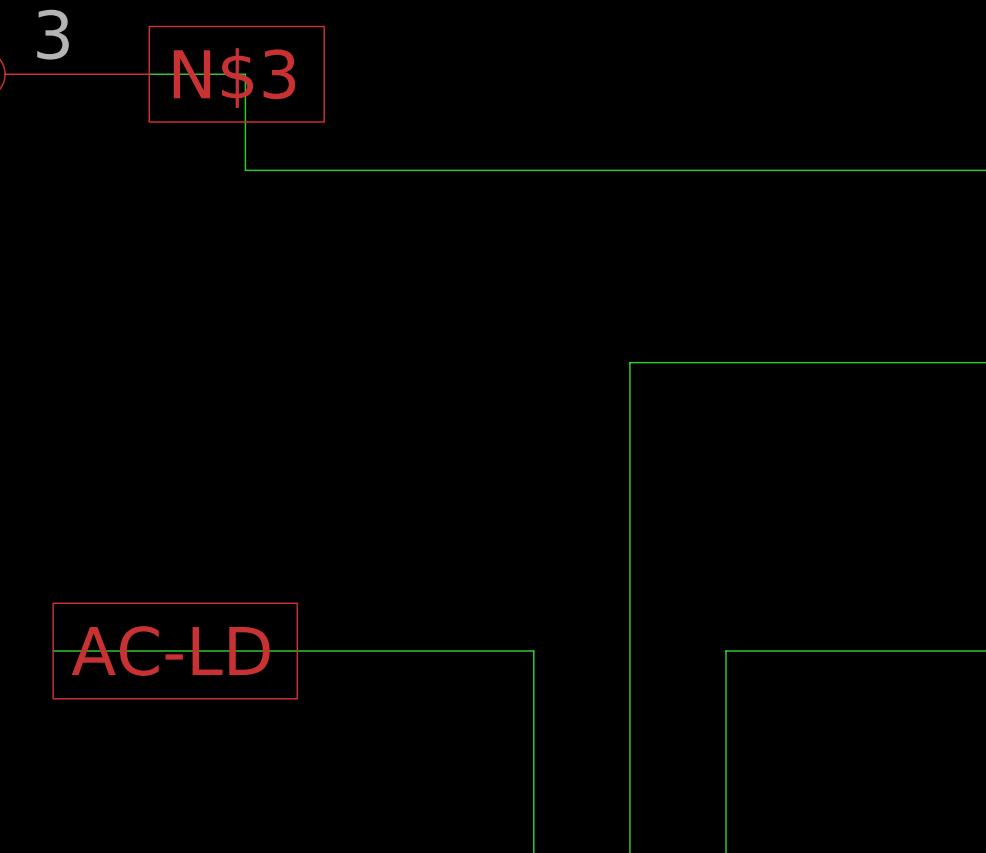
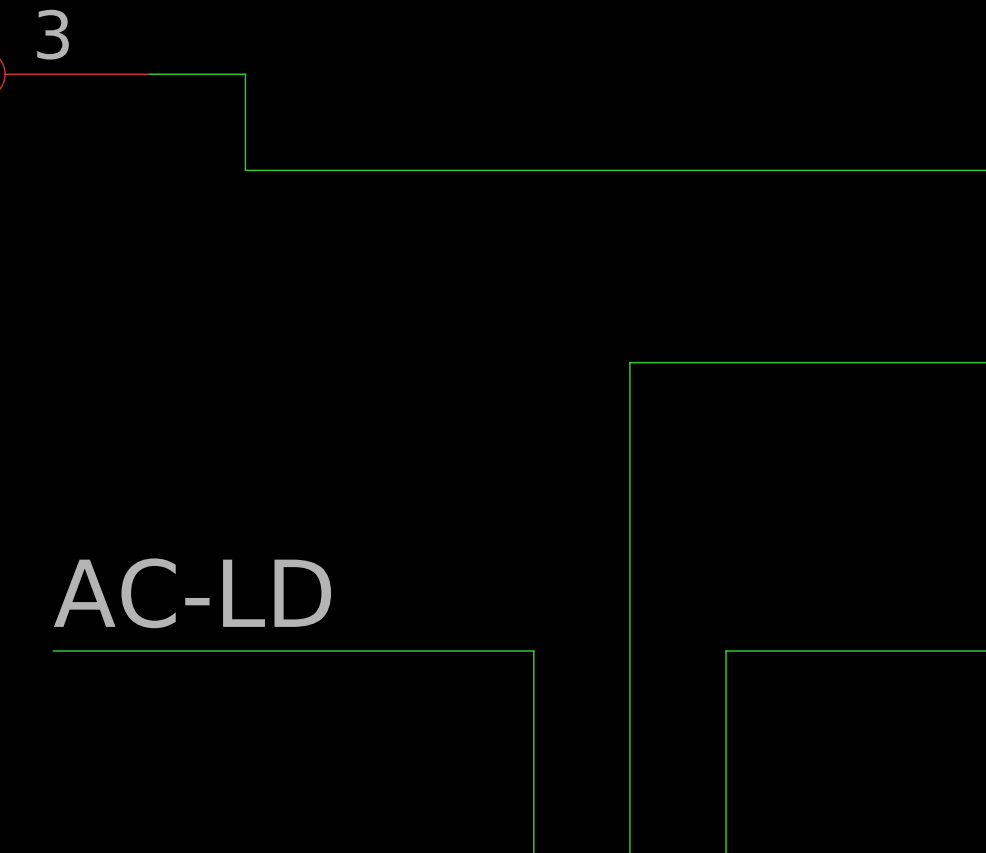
global label: N$3 (234, 78) -> none
label: none -> AC-LD (192, 593)
global label: AC-LD (170, 651) -> none

